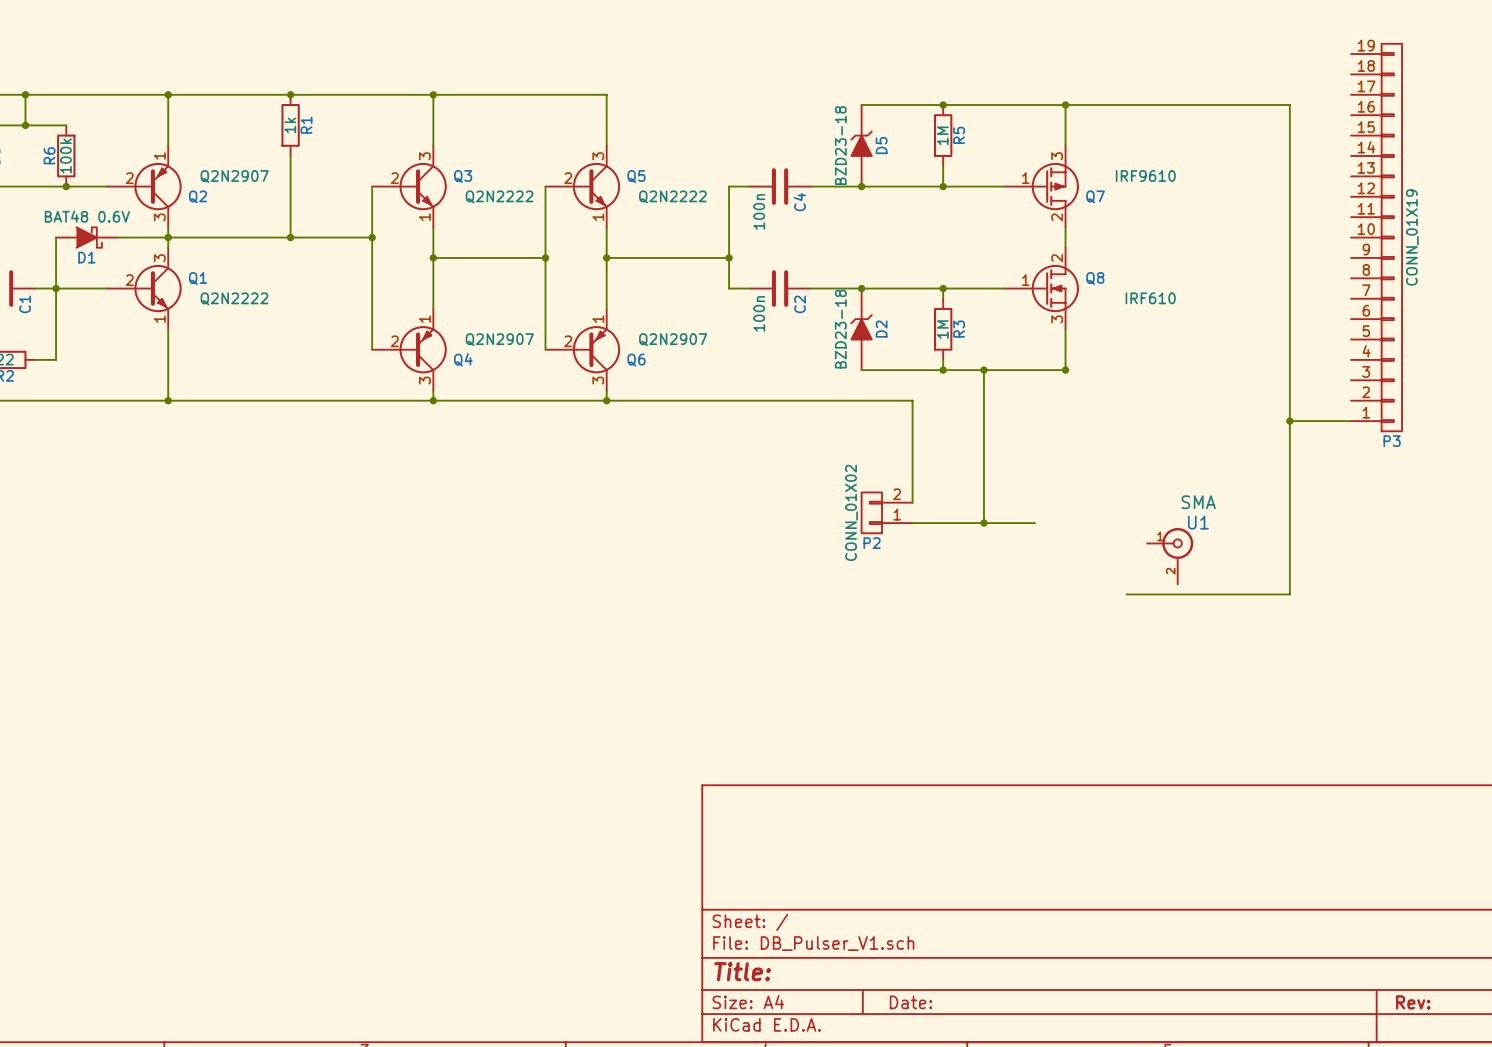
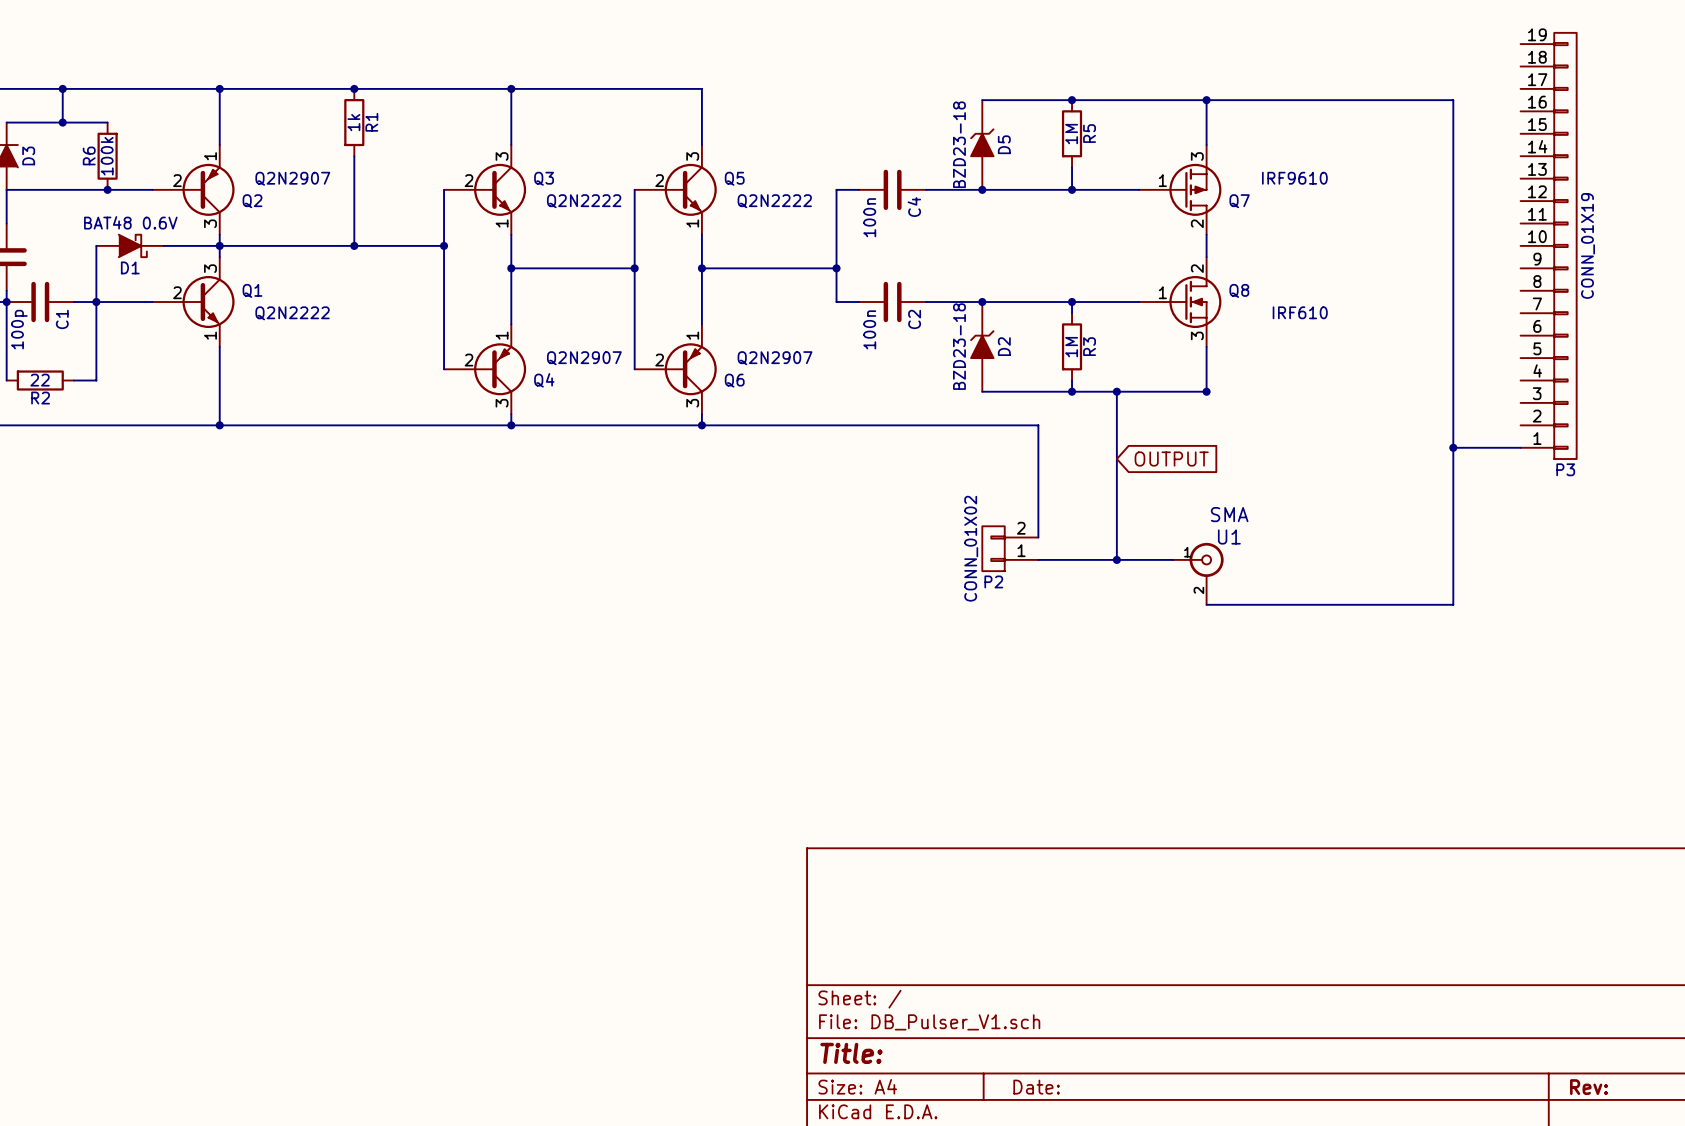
global label: none -> OUTPUT (1171, 459)
U1 position: (1170, 556) -> (1198, 573)
wire: (1289, 563) (1289, 594) (1126, 594) -> (1453, 604) (1206, 604)

